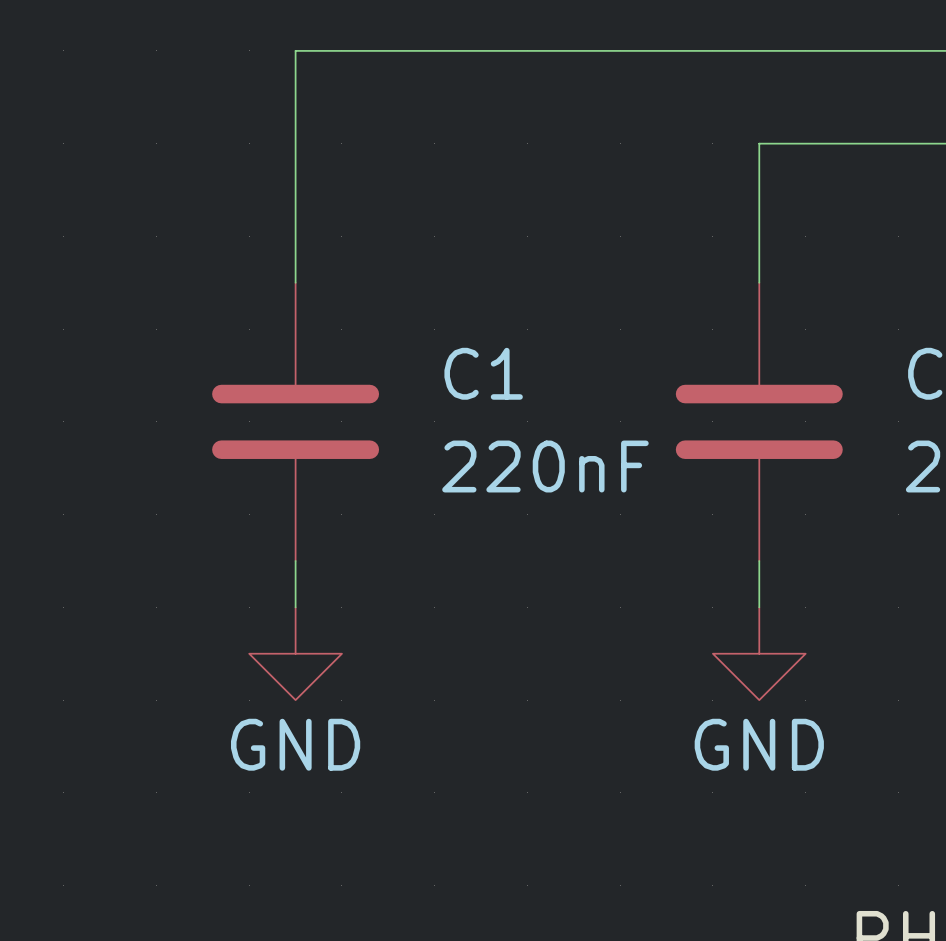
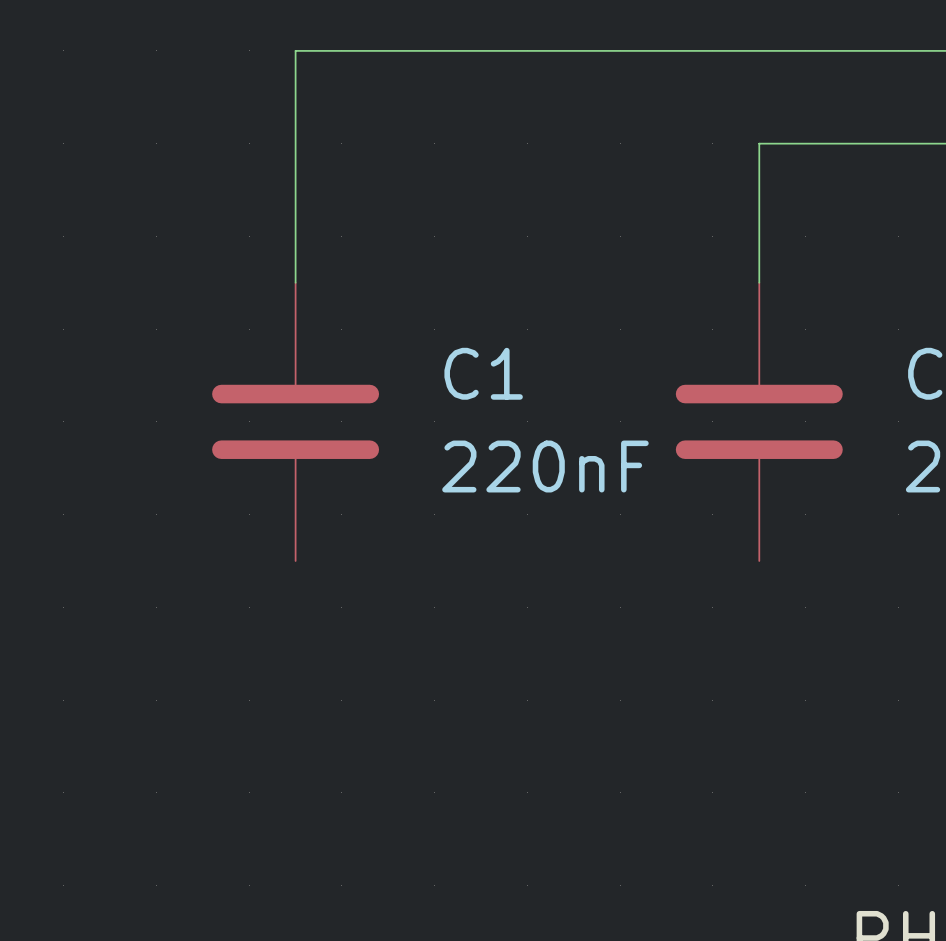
wire: (295, 560) (295, 607) -> none
wire: (759, 560) (759, 607) -> none
power symbol: GND (295, 653) -> none
power symbol: GND (759, 653) -> none

